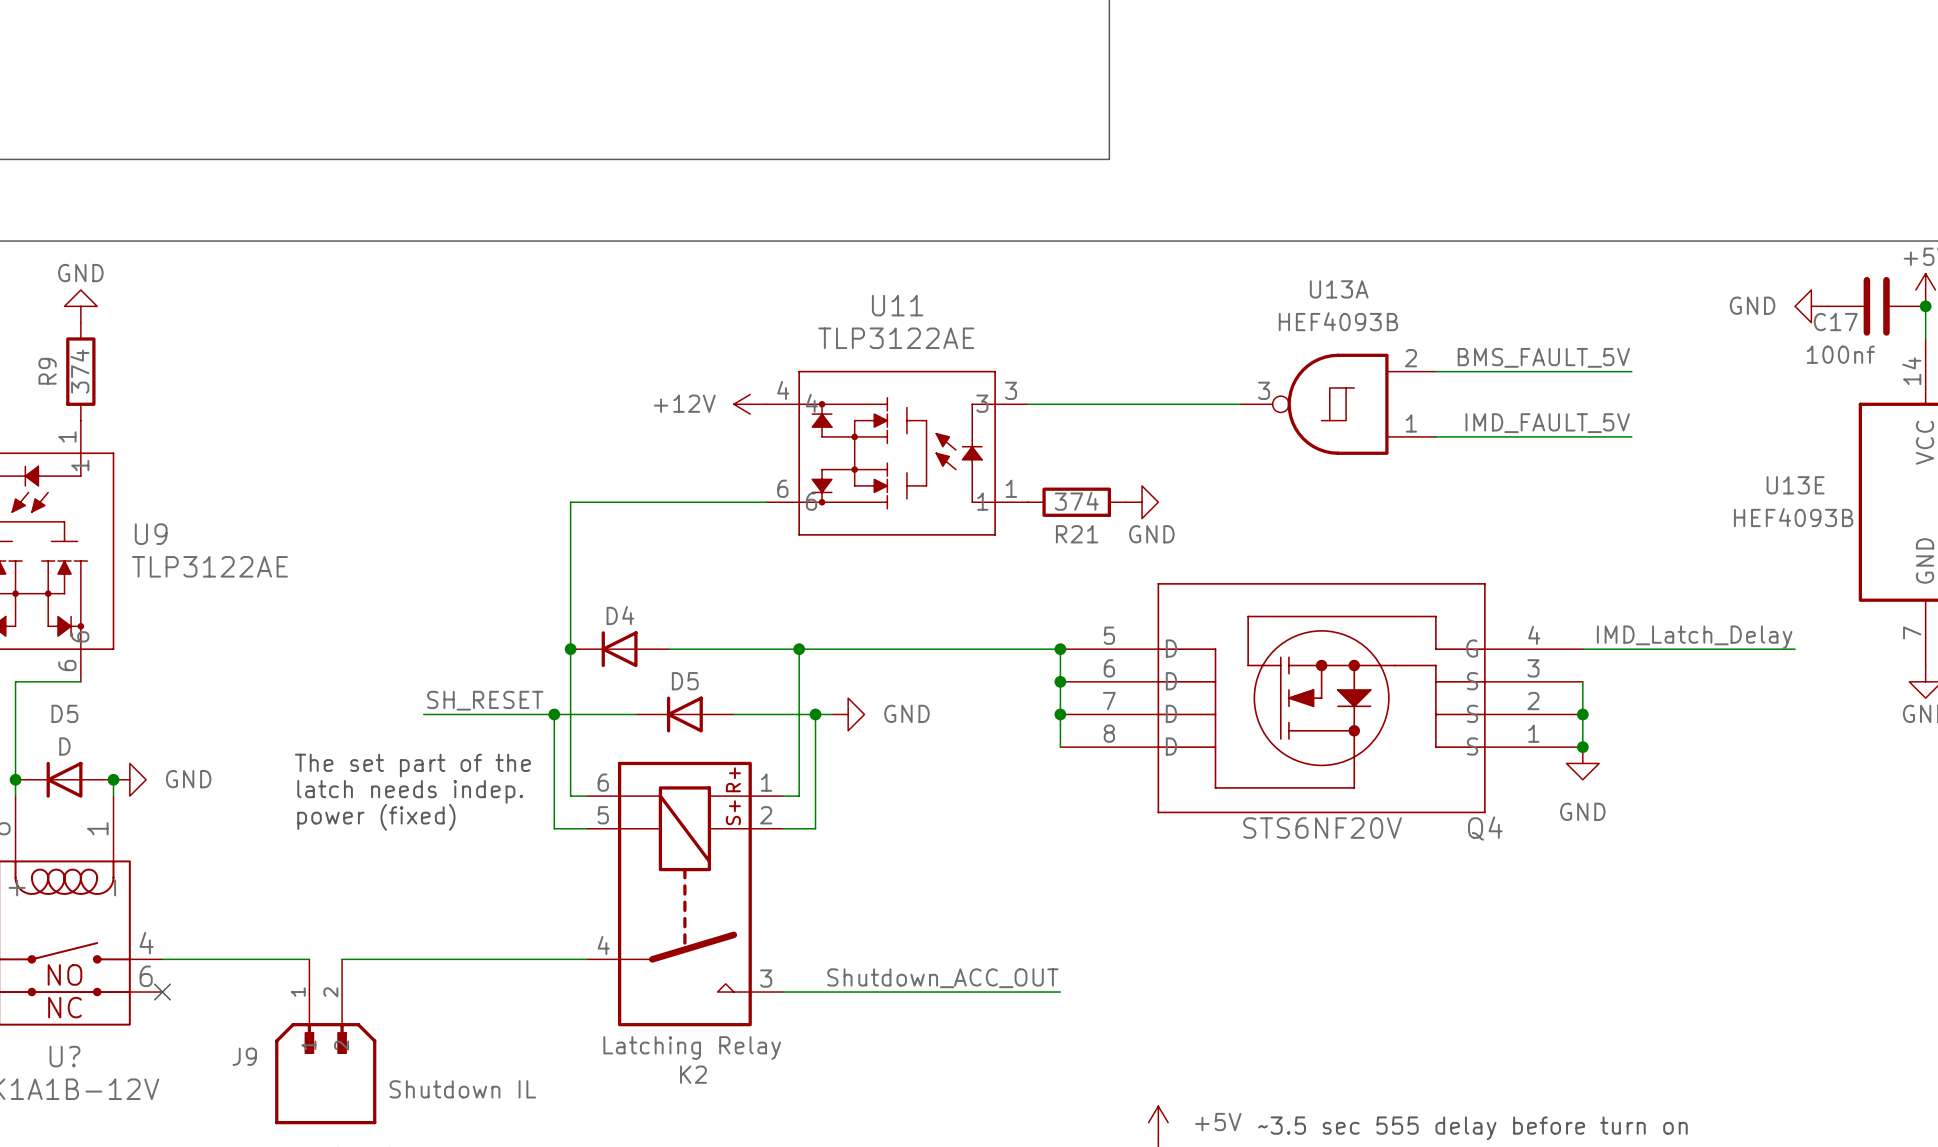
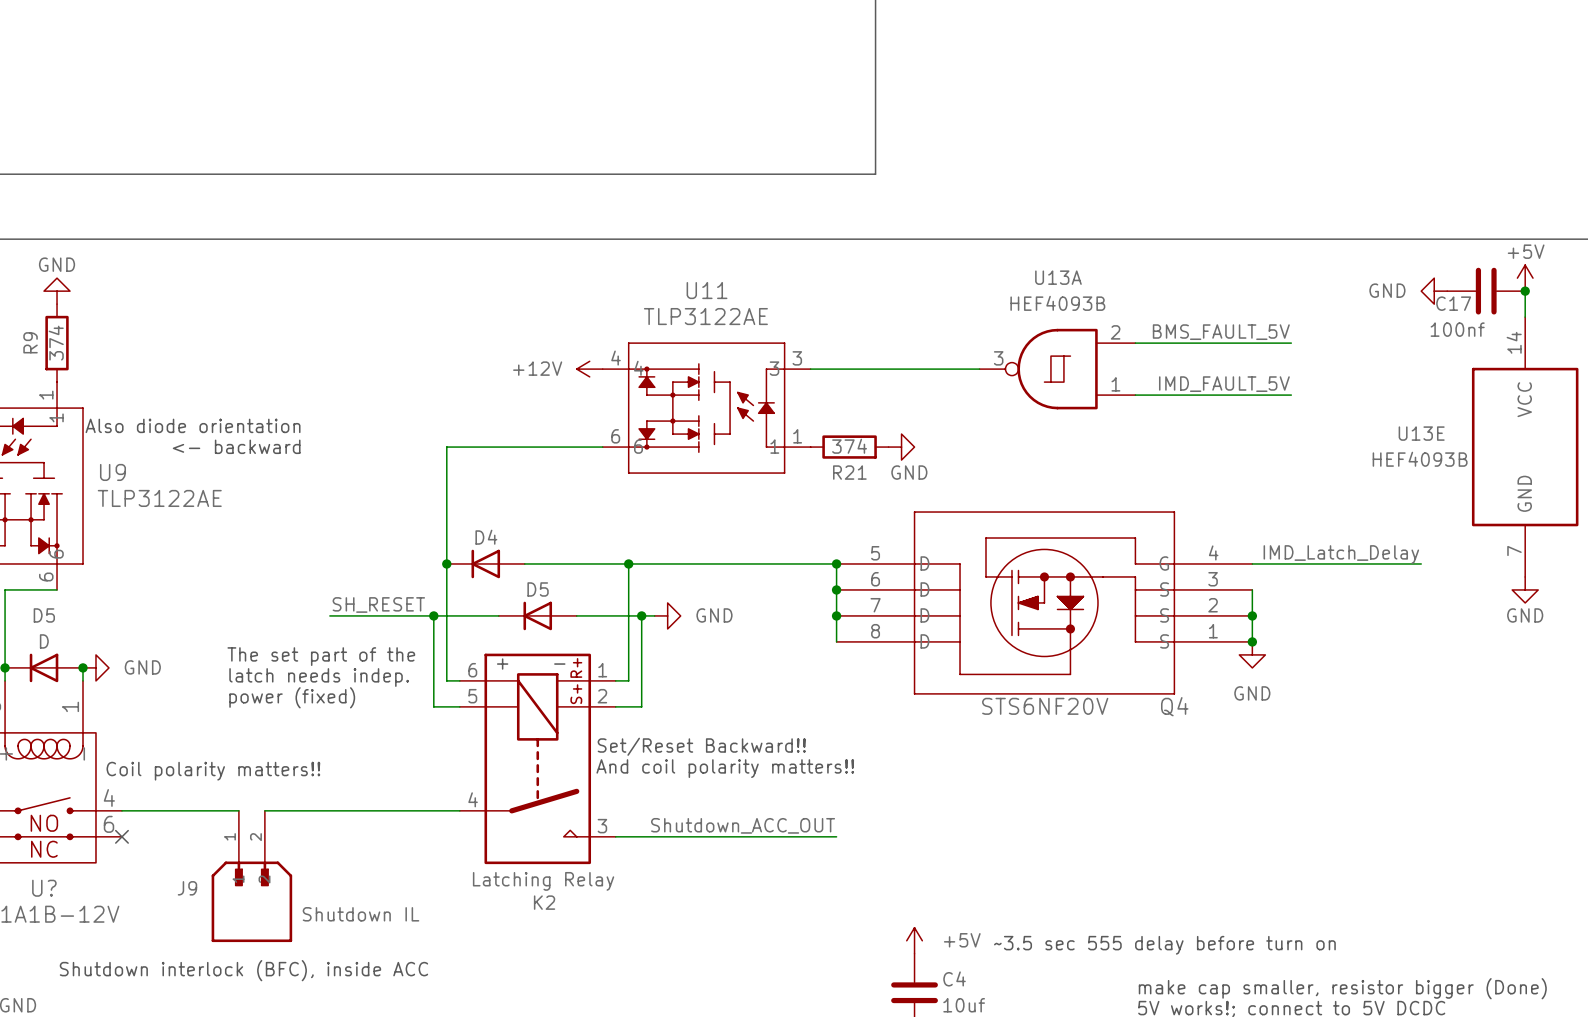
text: none -> Also diode orientation (193, 425)
text: none -> <- backward (236, 446)
text: none -> + (502, 664)
text: none -> - (559, 664)
text: none -> Set/Reset Backward!! (701, 746)
text: none -> And coil polarity matters!! (725, 768)
text: none -> Coil polarity matters!! (213, 771)

